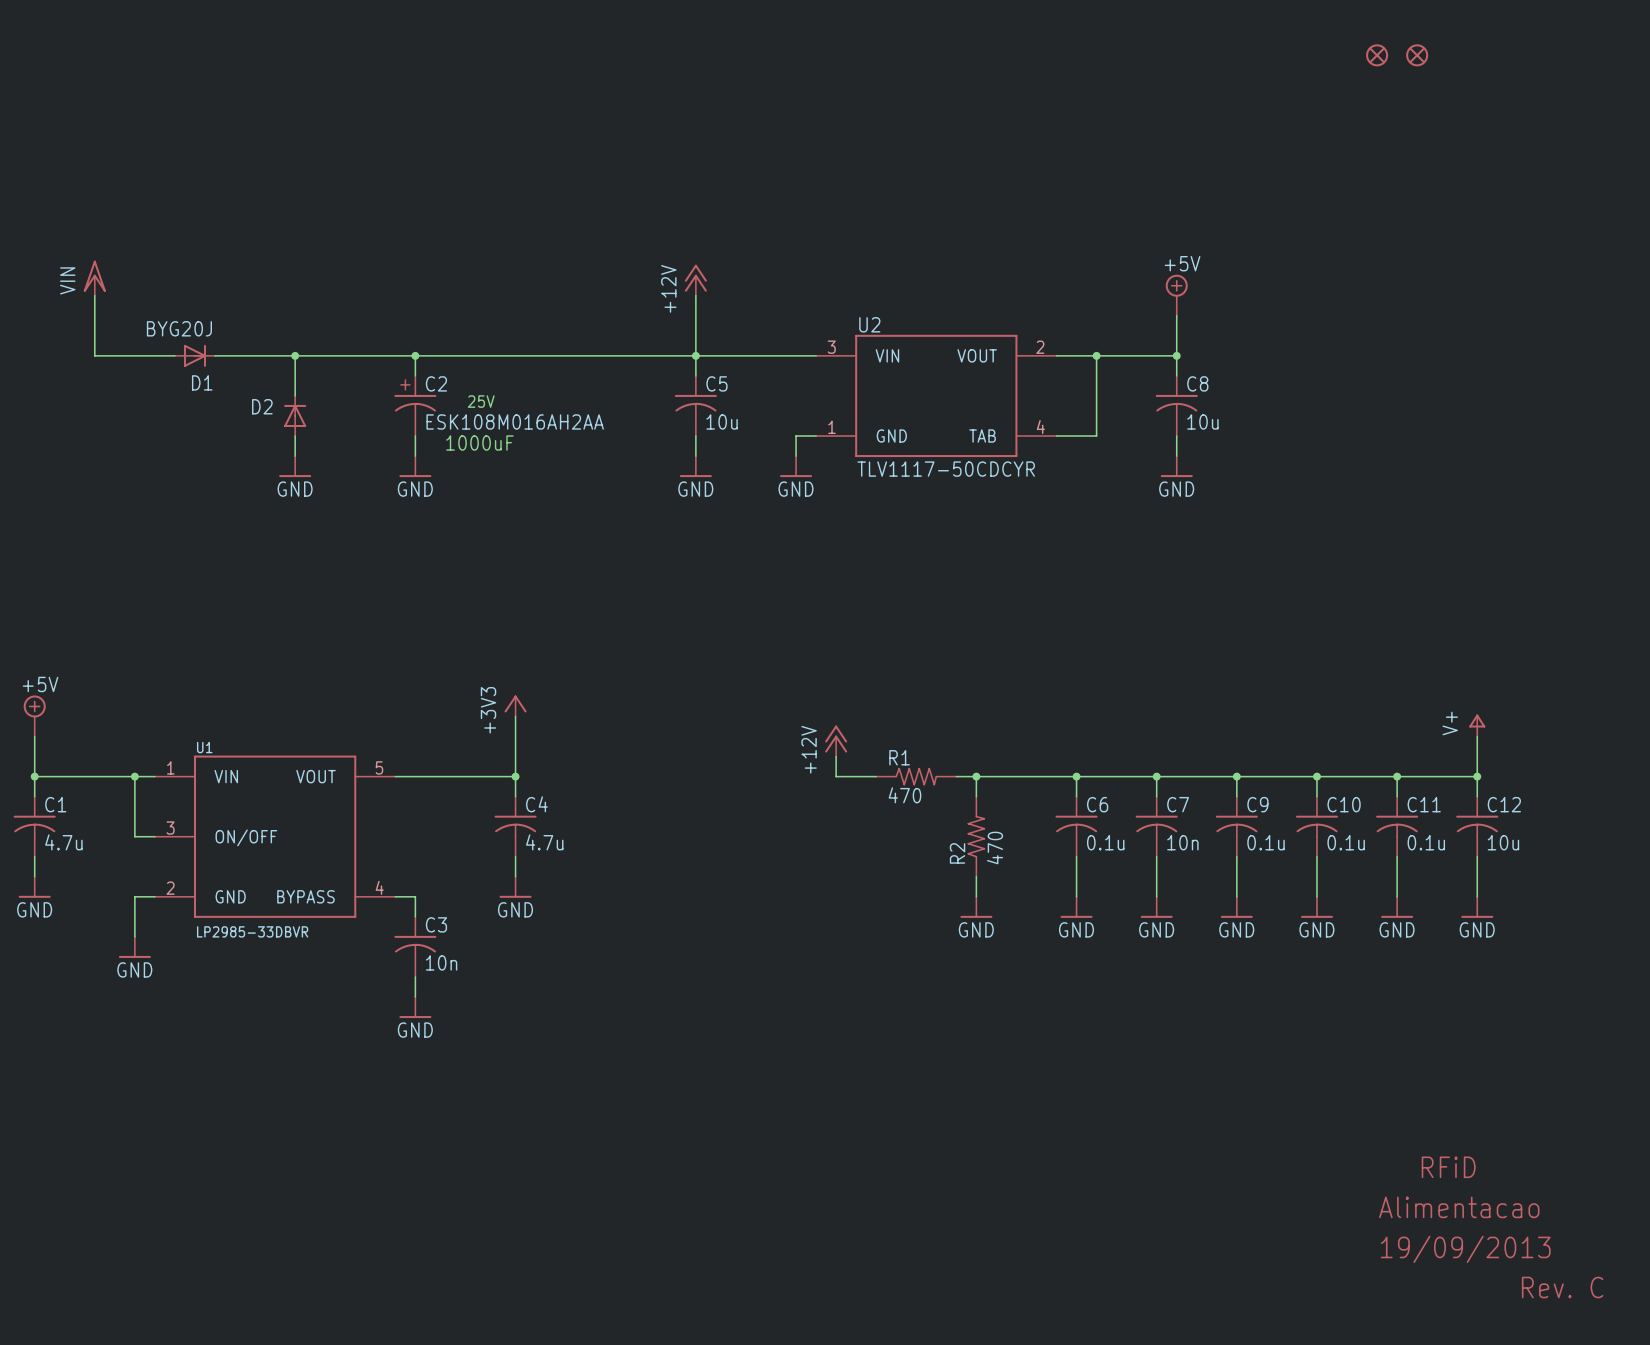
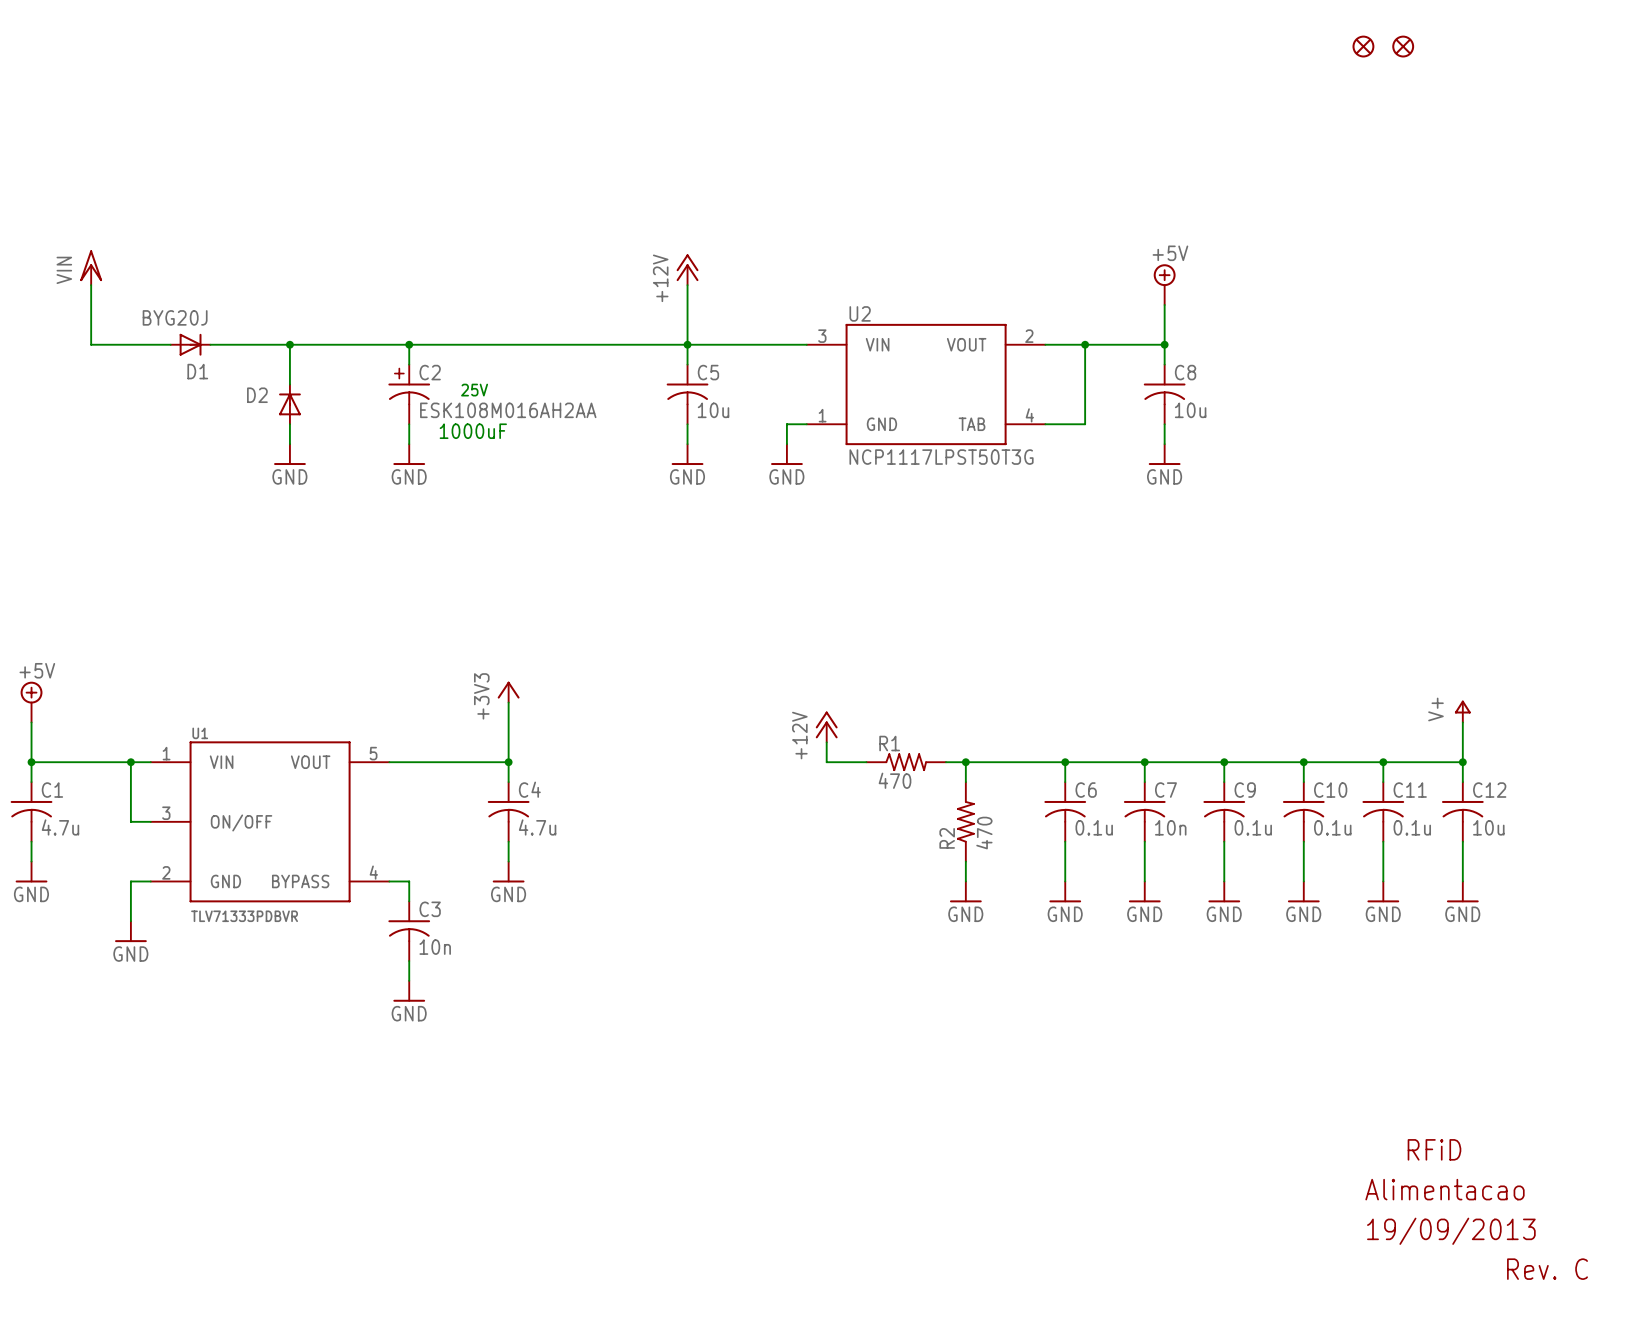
U2 value: TLV1117-50CDCYR (946, 469) -> NCP1117LPST50T3G (941, 457)
U1 value: LP2985-33DBVR (252, 931) -> TLV71333PDBVR (244, 916)

